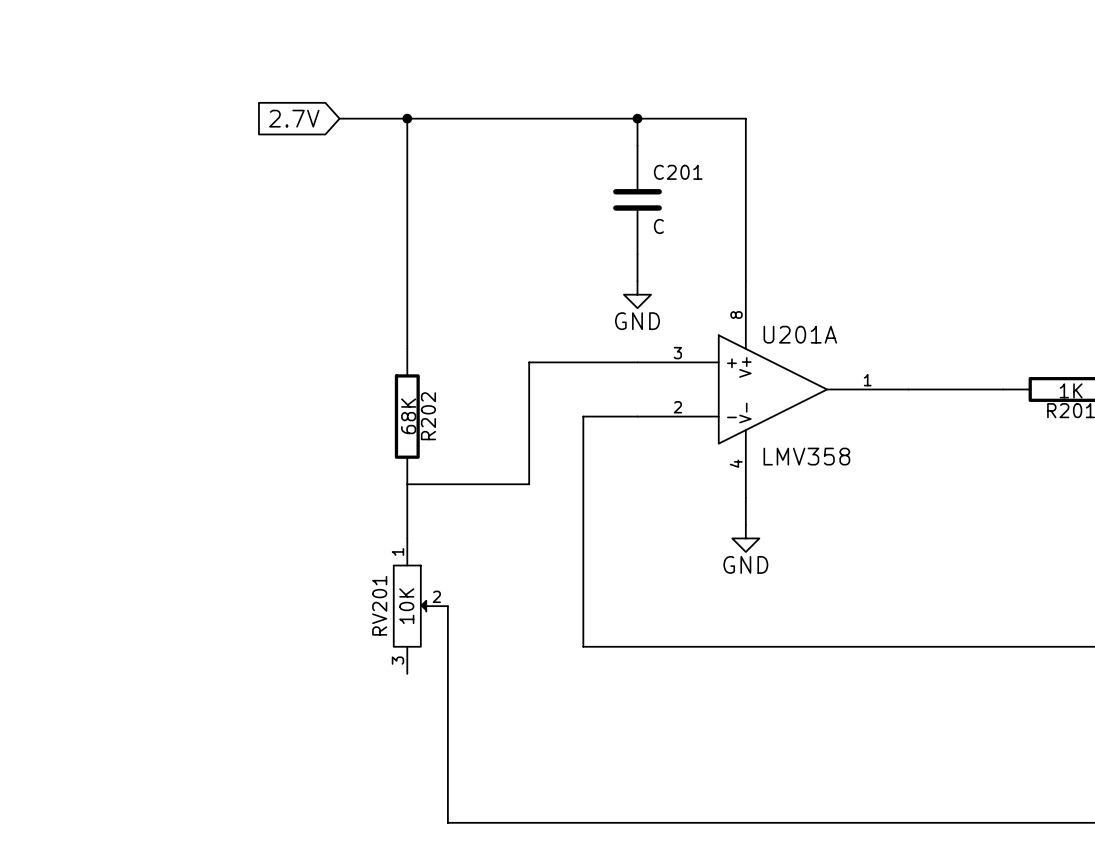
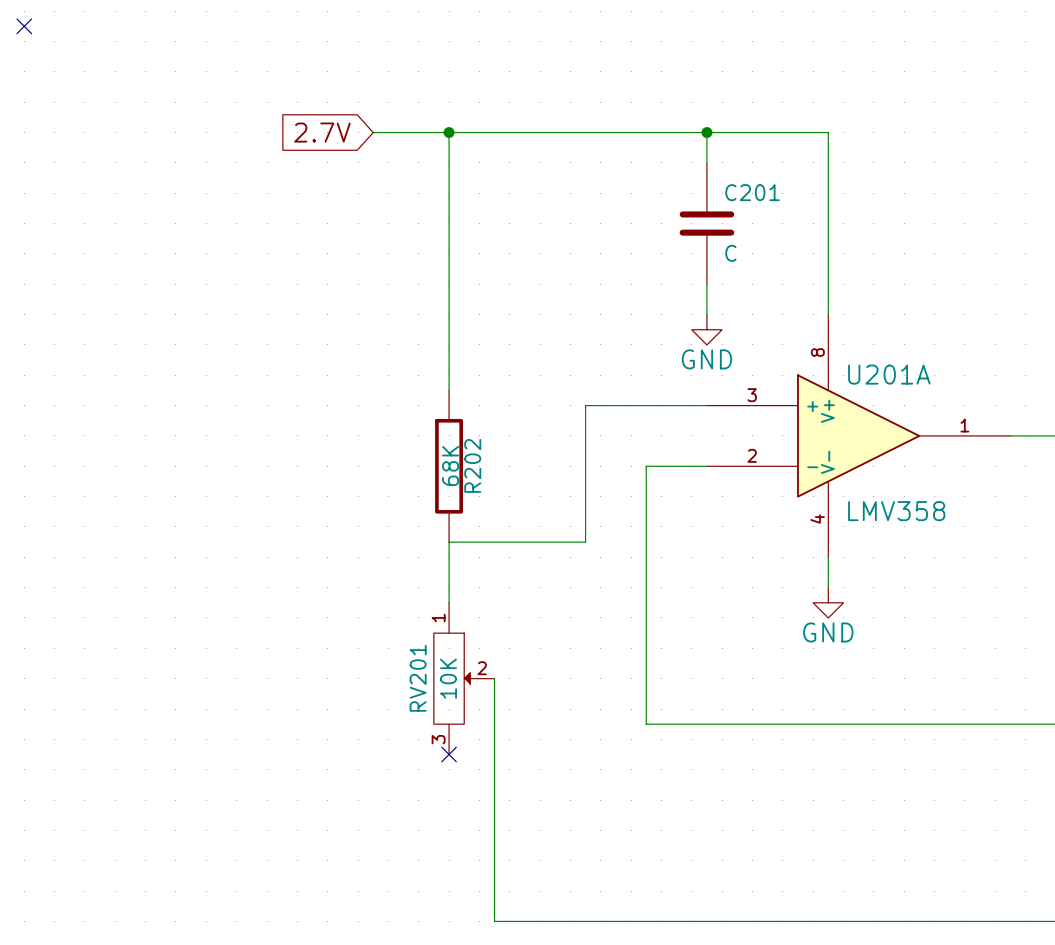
no-connect mark: none -> (24, 26)
no-connect mark: none -> (449, 754)

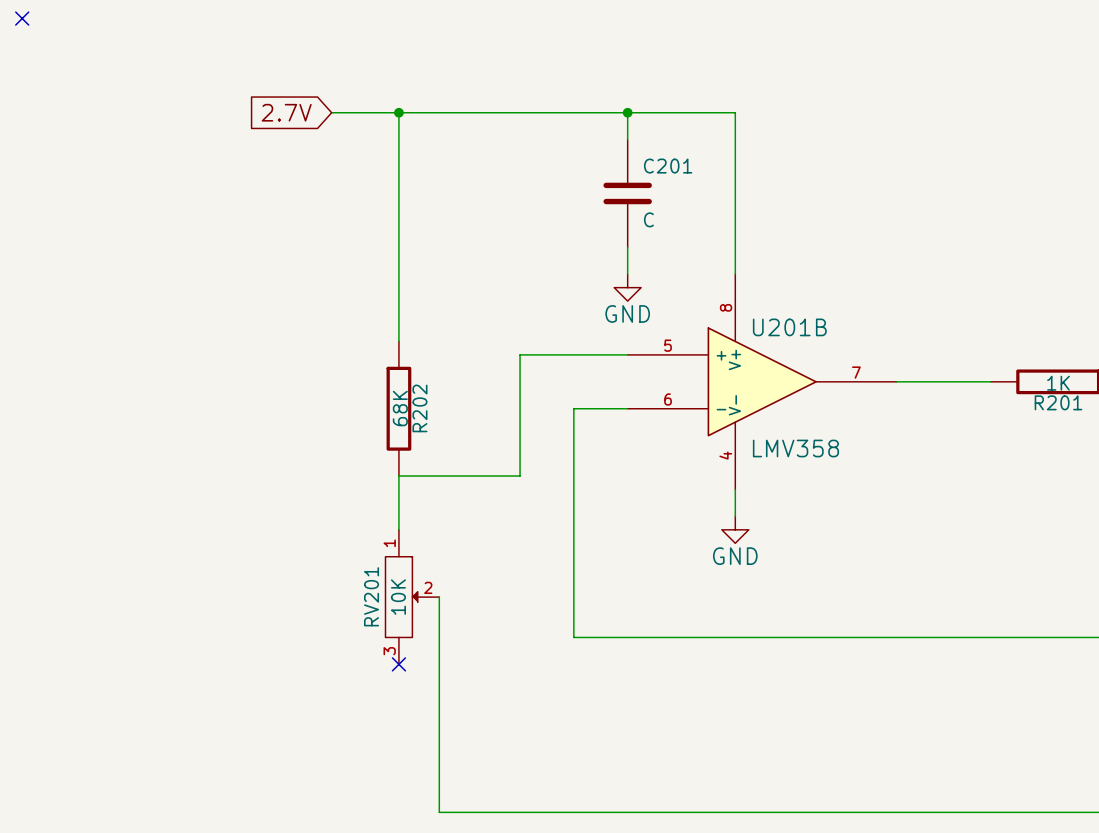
U201A name: U201A (889, 374) -> U201B (789, 327)
U201A pin number: 3 (752, 395) -> 5 (668, 345)
U201A pin number: 1 (964, 425) -> 7 (856, 372)
U201A pin number: 2 (752, 455) -> 6 (668, 399)

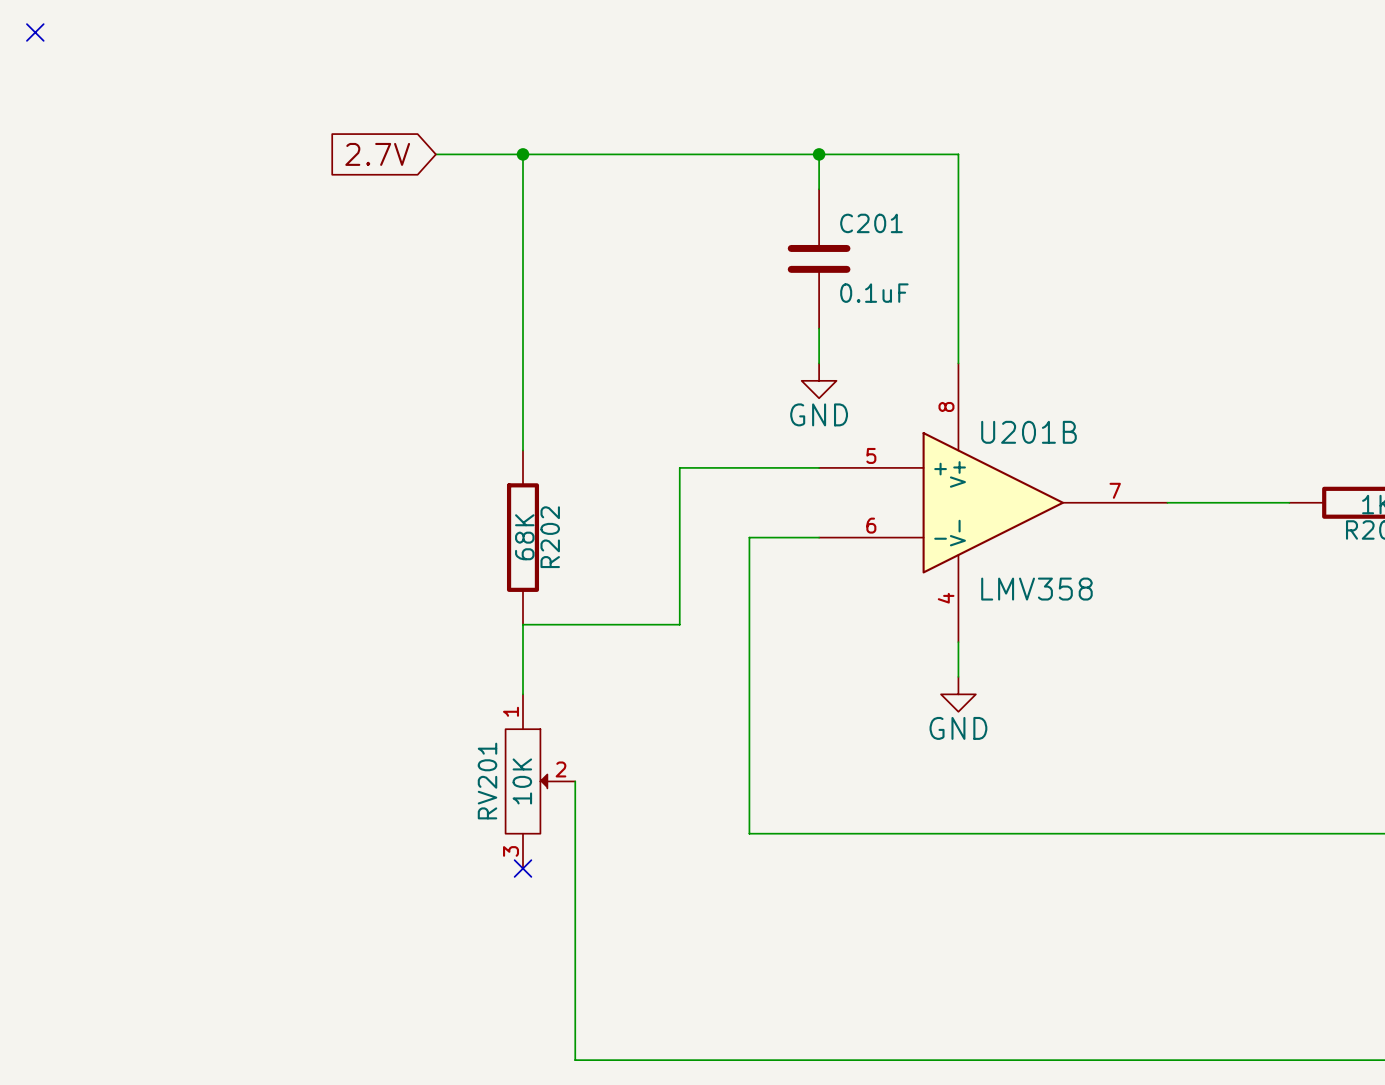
C201 value: C (648, 219) -> 0.1uF (874, 293)

